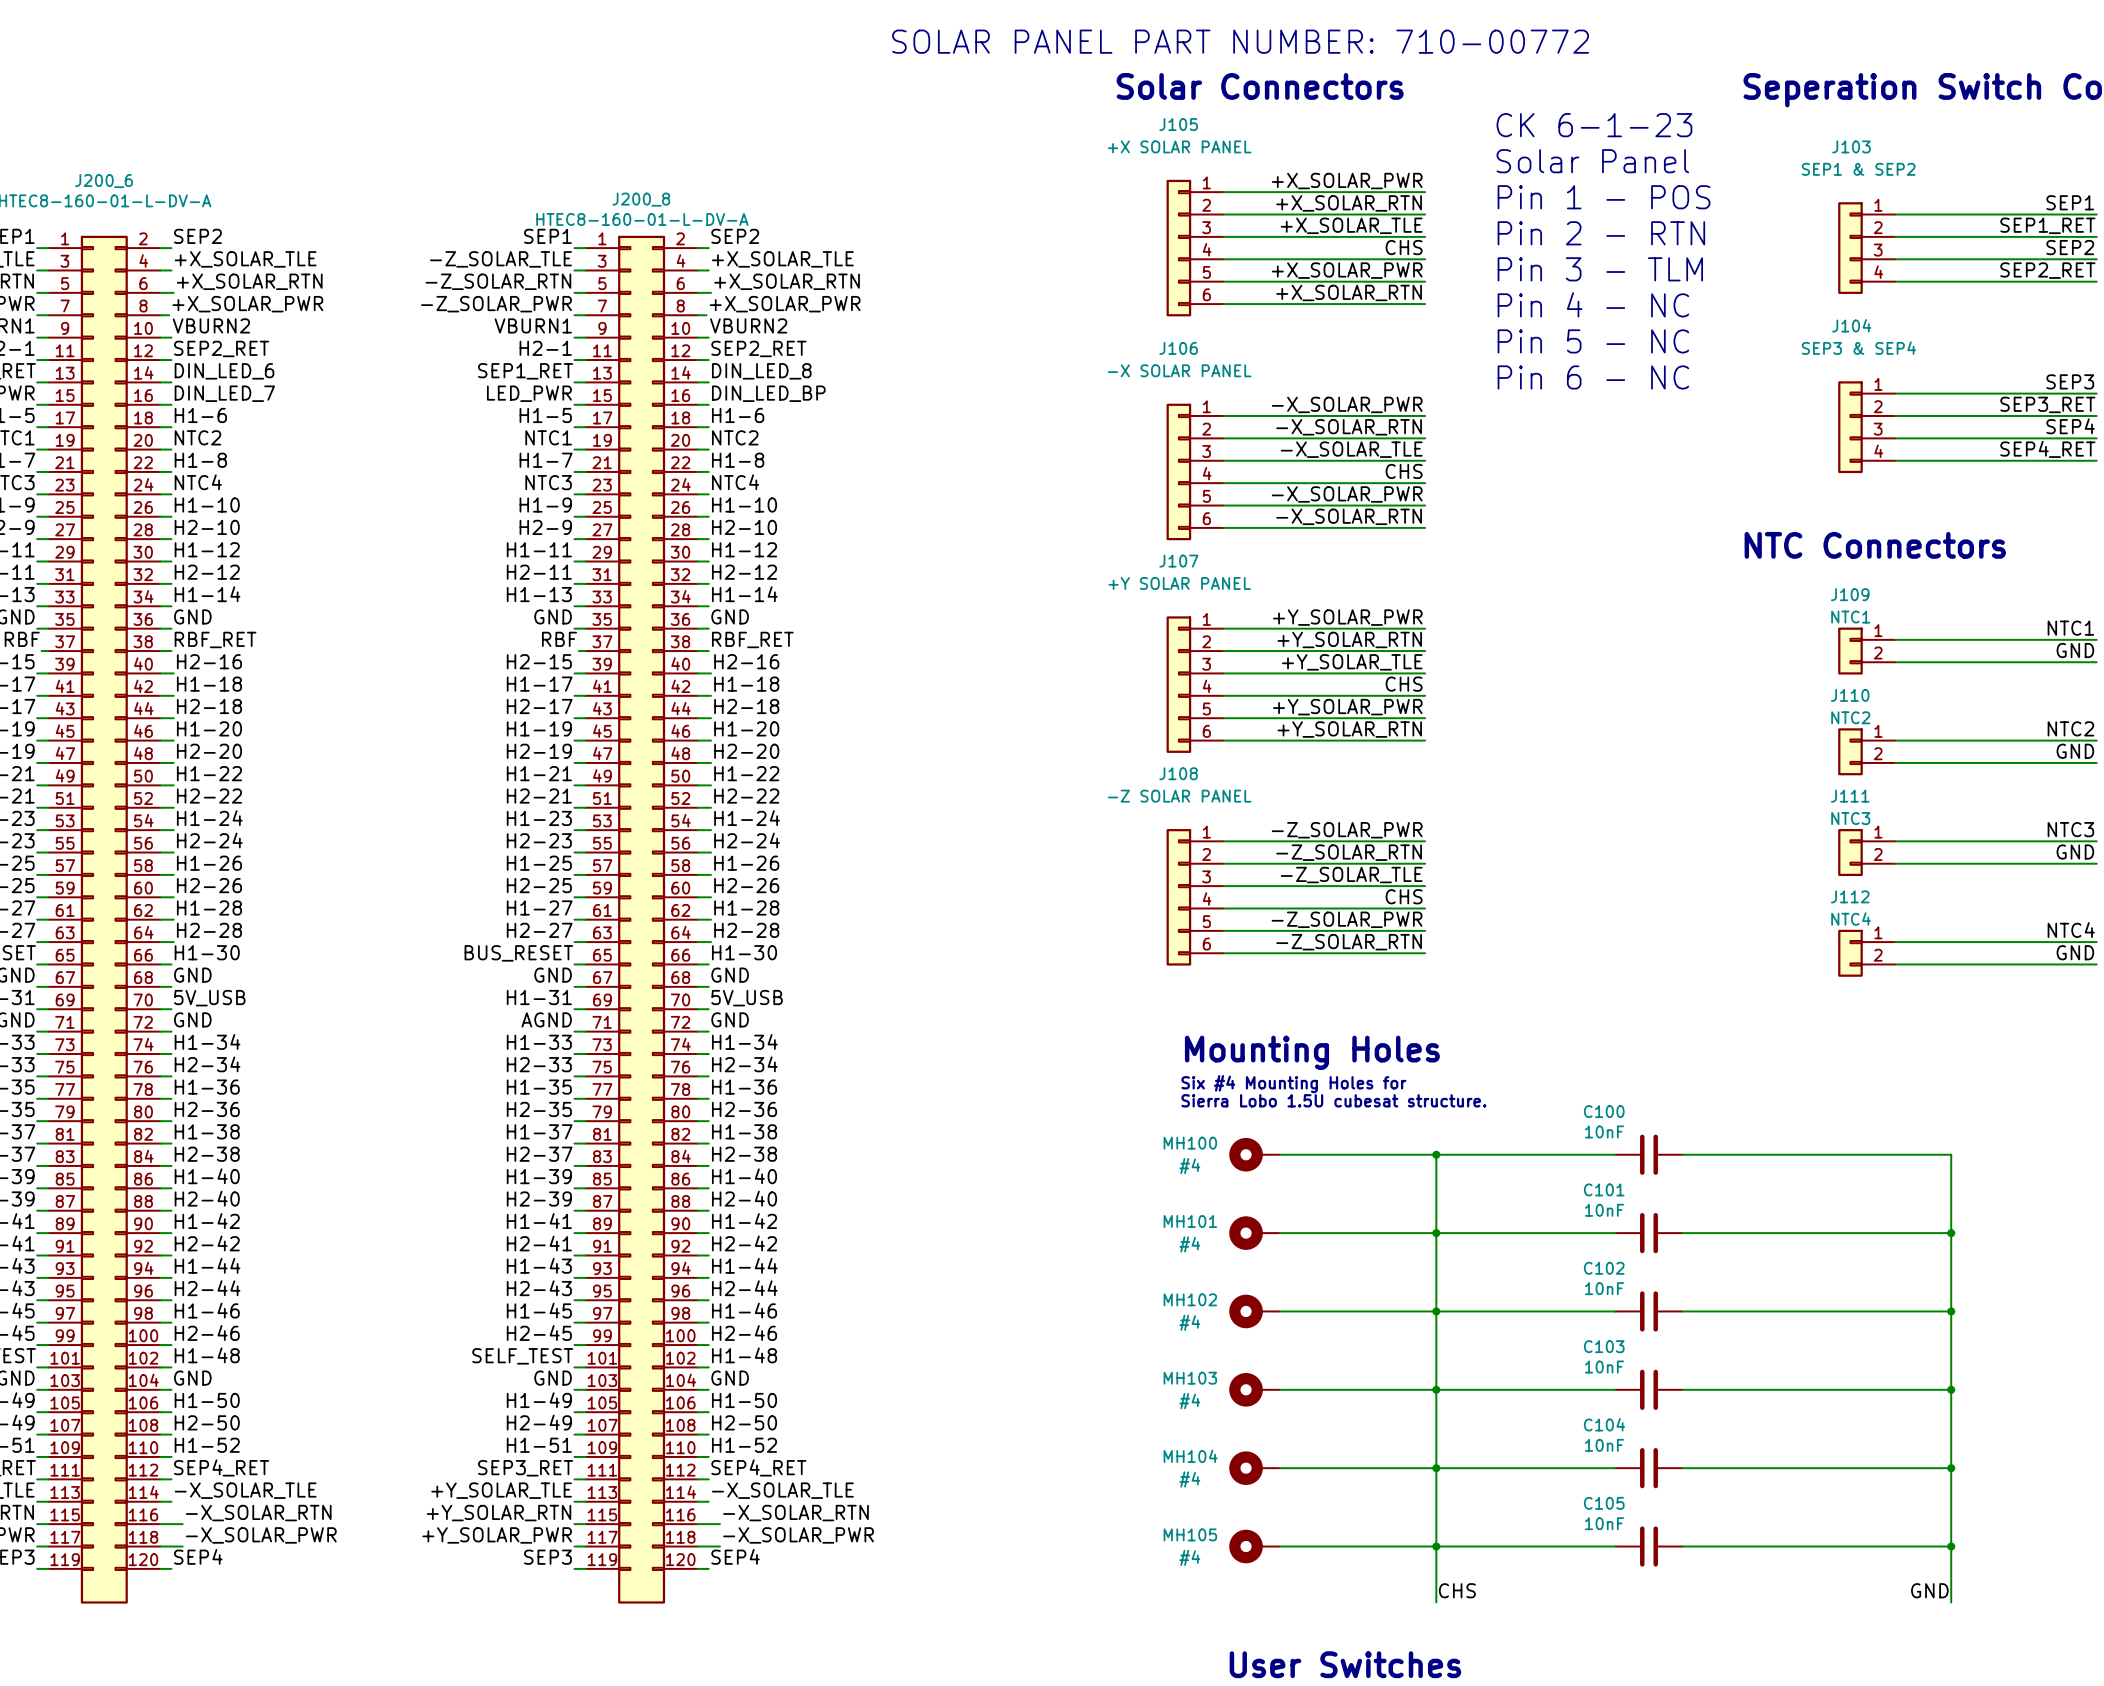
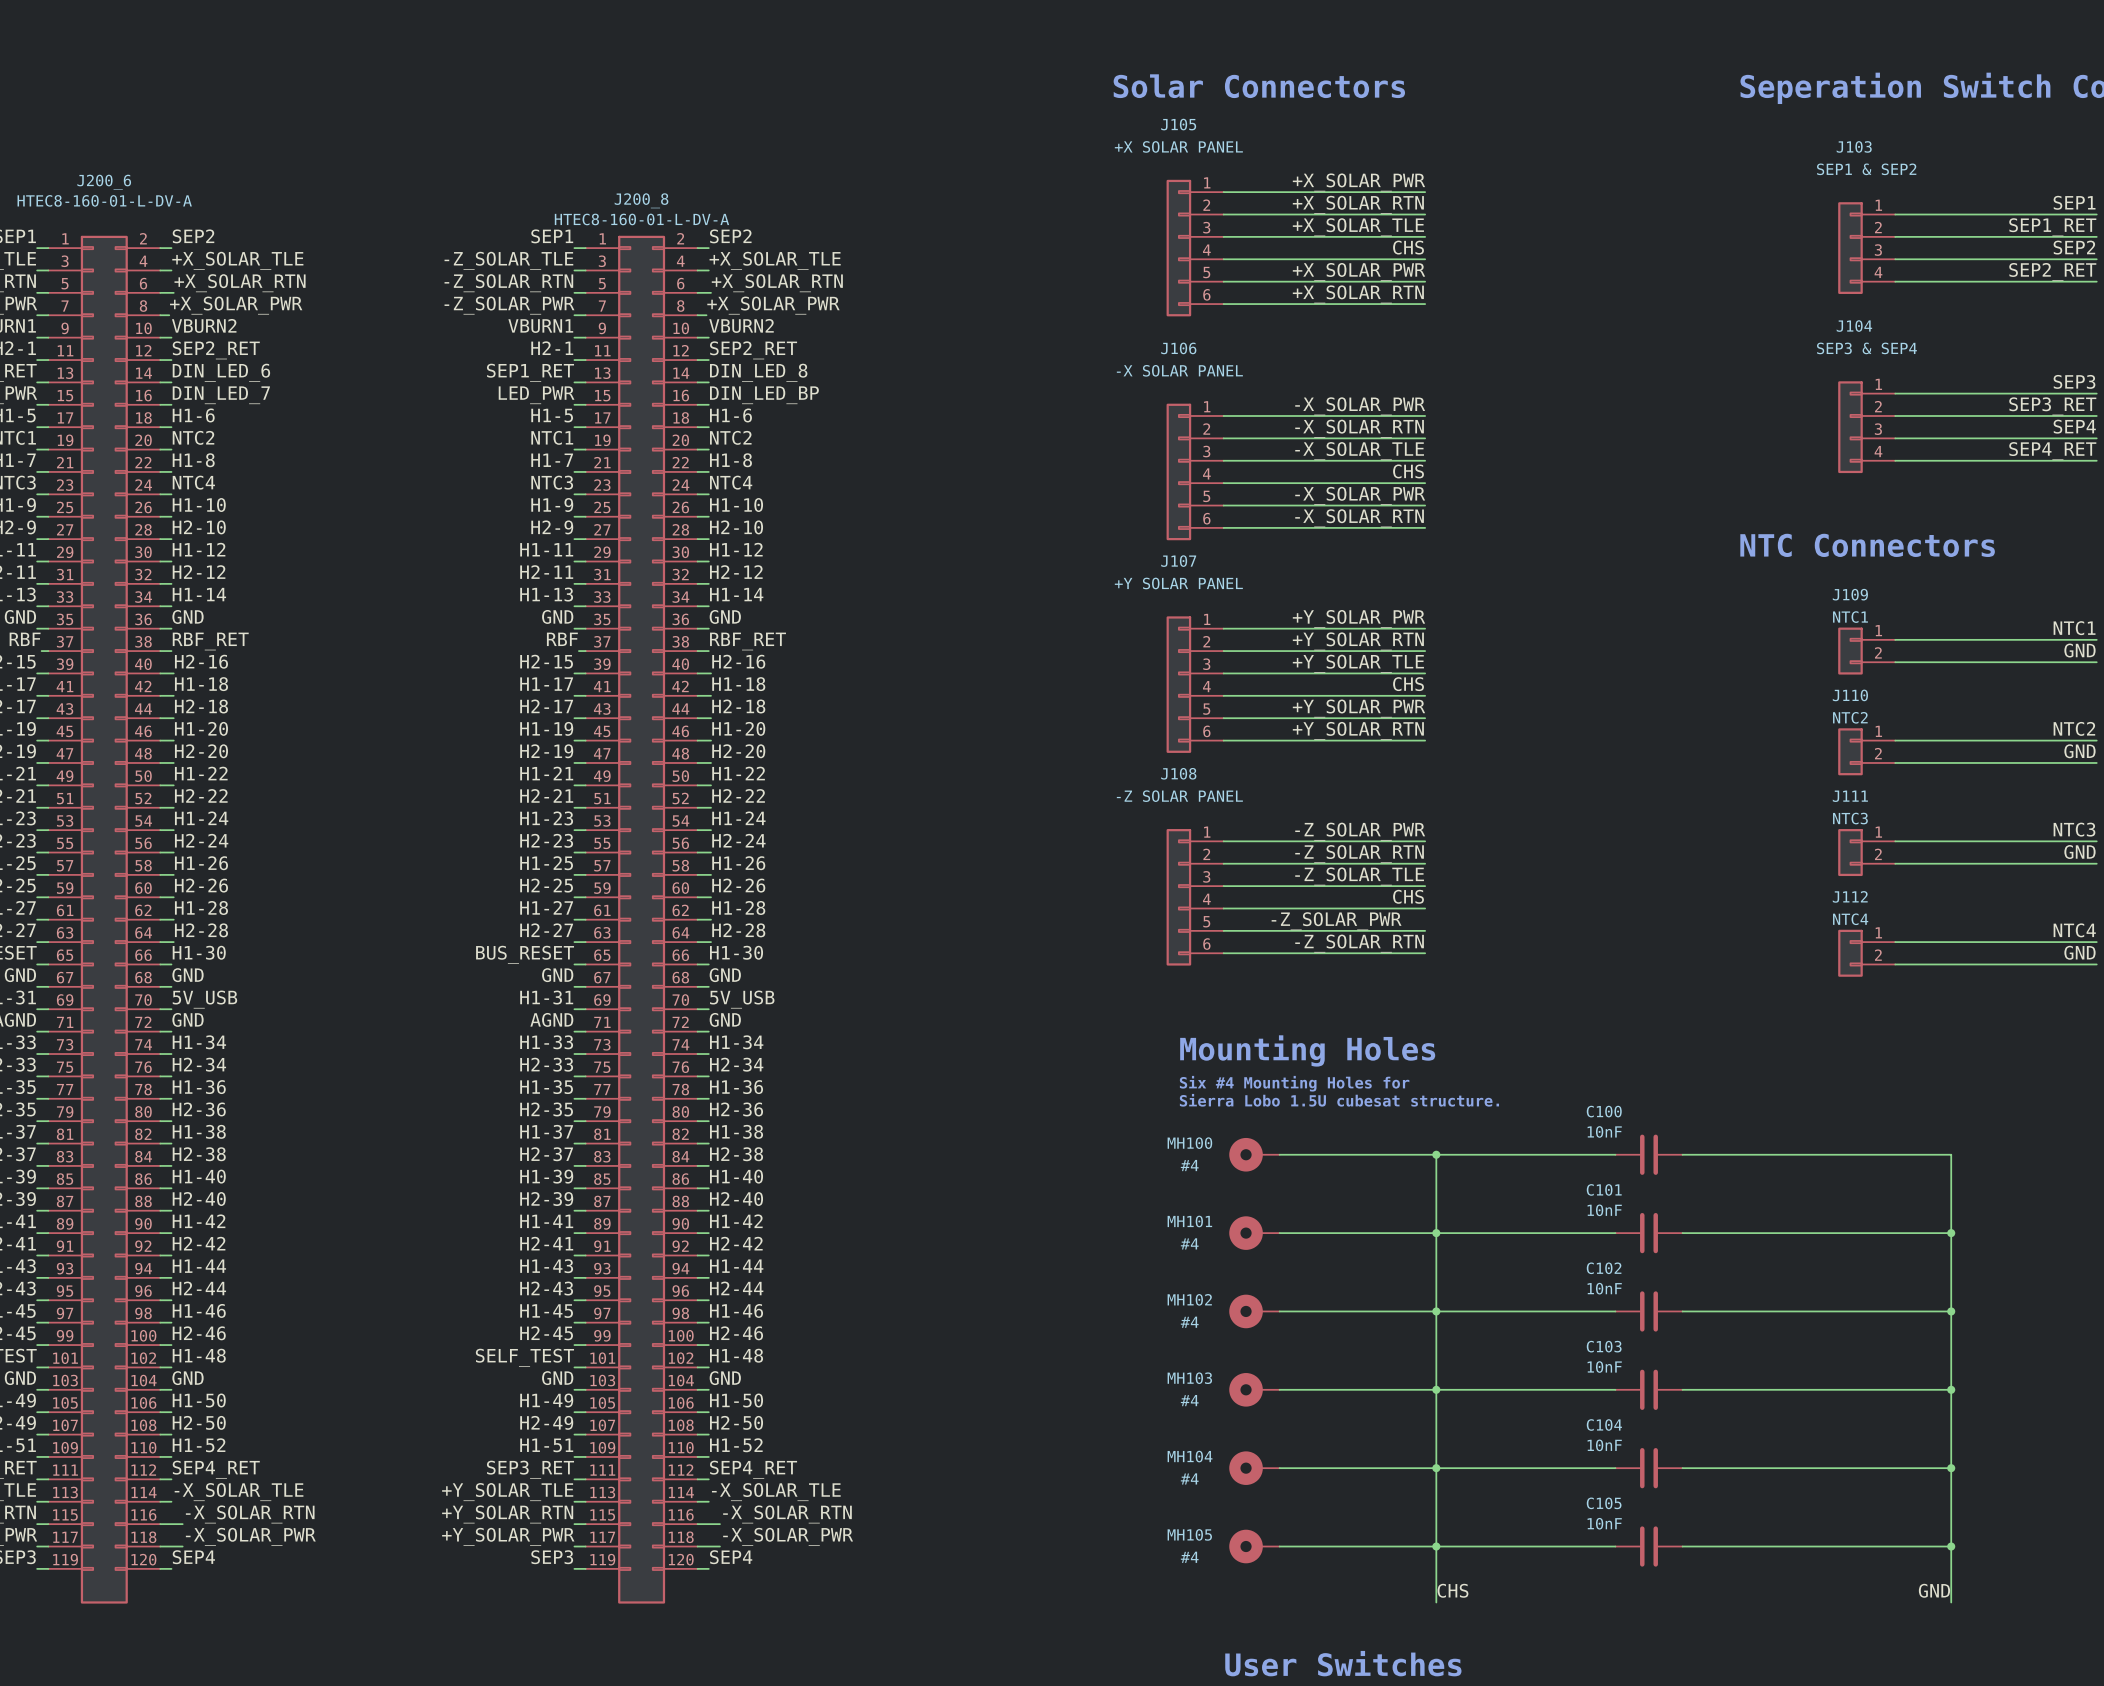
text: SOLAR PANEL PART NUMBER: 710-00772 (1240, 41) -> none
text: CK 6-1-23 (1594, 125) -> none
text: Solar Panel (1592, 161) -> none
text: Pin 1 - POS (1604, 197) -> none
text: Pin 2 - RTN (1601, 233) -> none
text: Pin 3 - TLM (1600, 269) -> none
text: Pin 4 - NC (1593, 304) -> none
text: Pin 5 - NC (1593, 341) -> none
text: Pin 6 - NC (1593, 377) -> none

